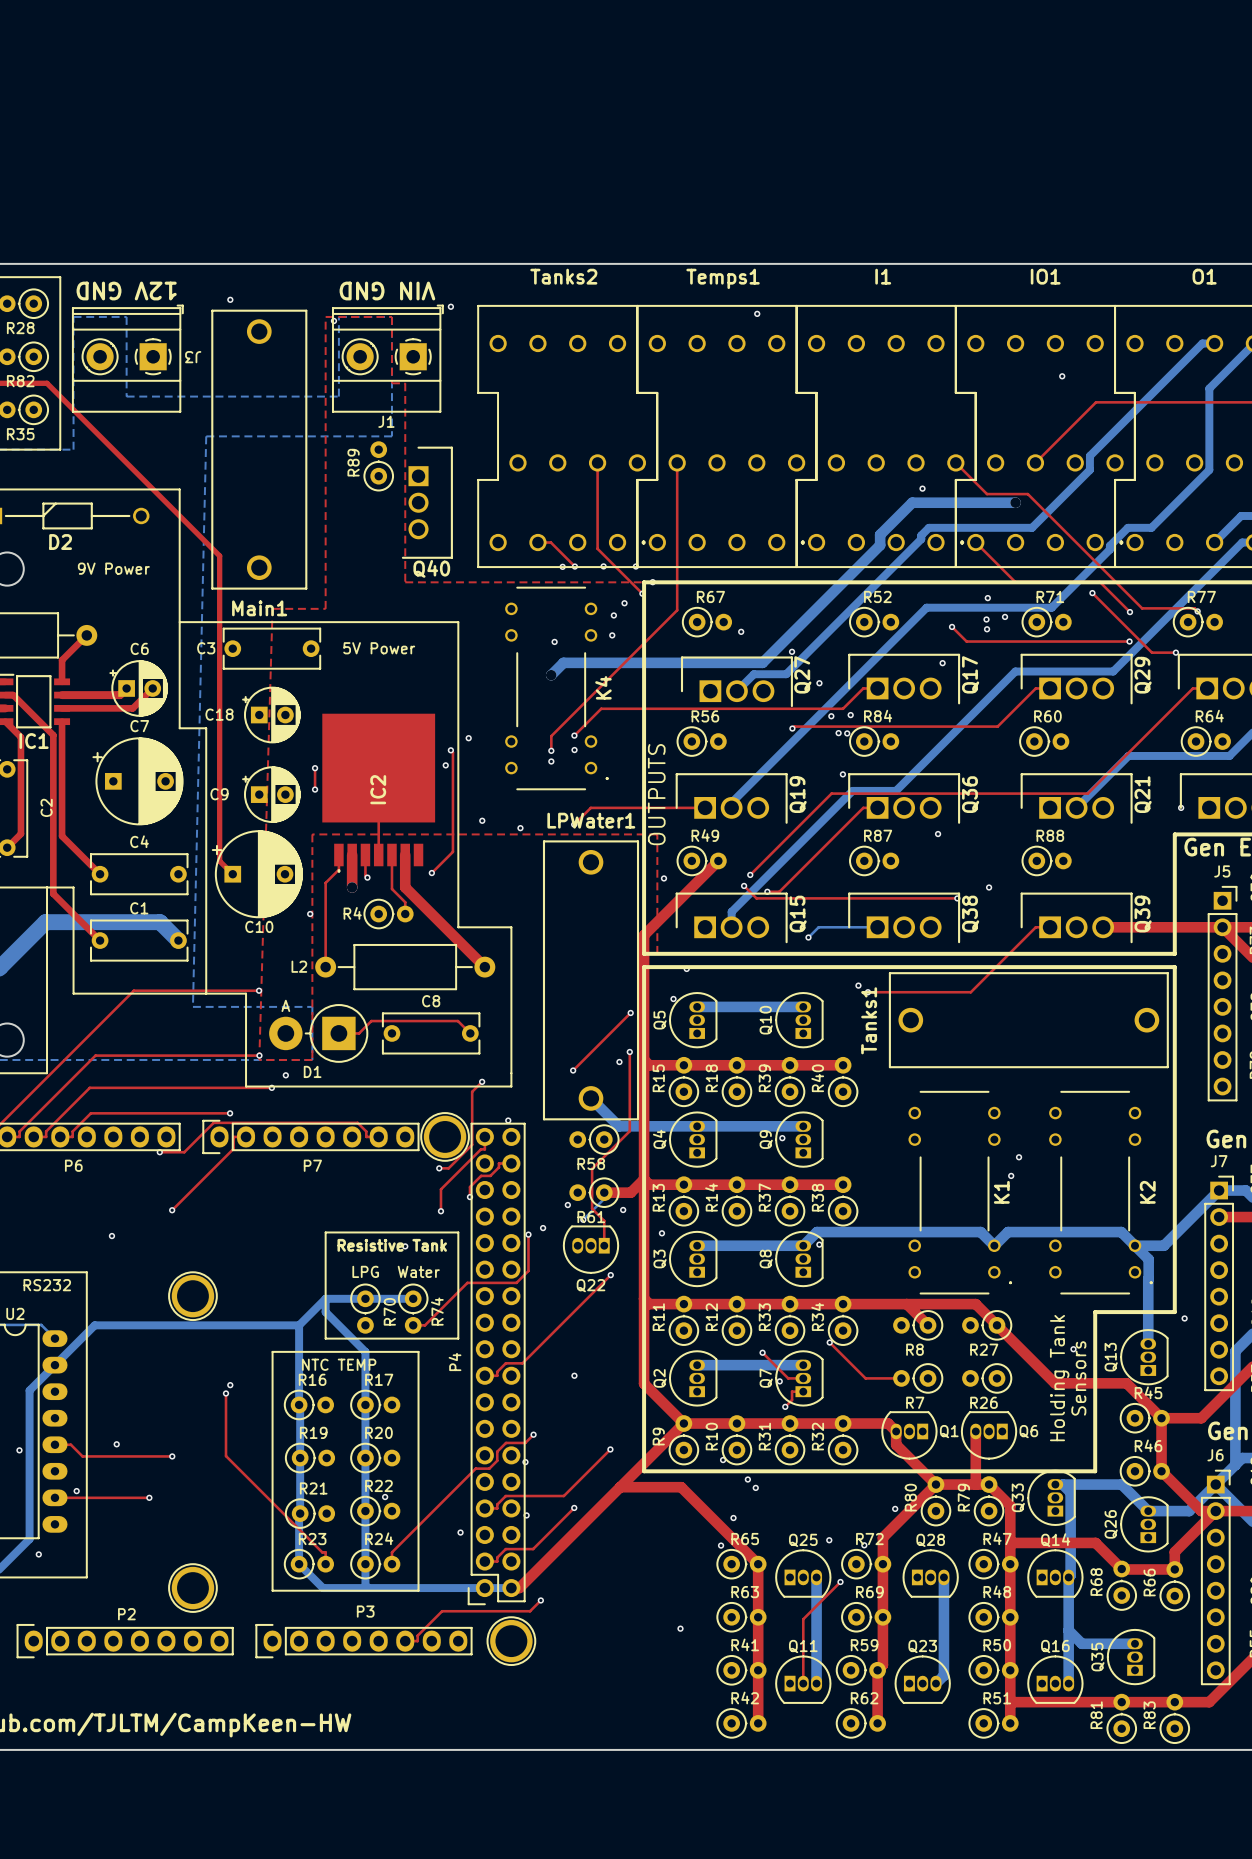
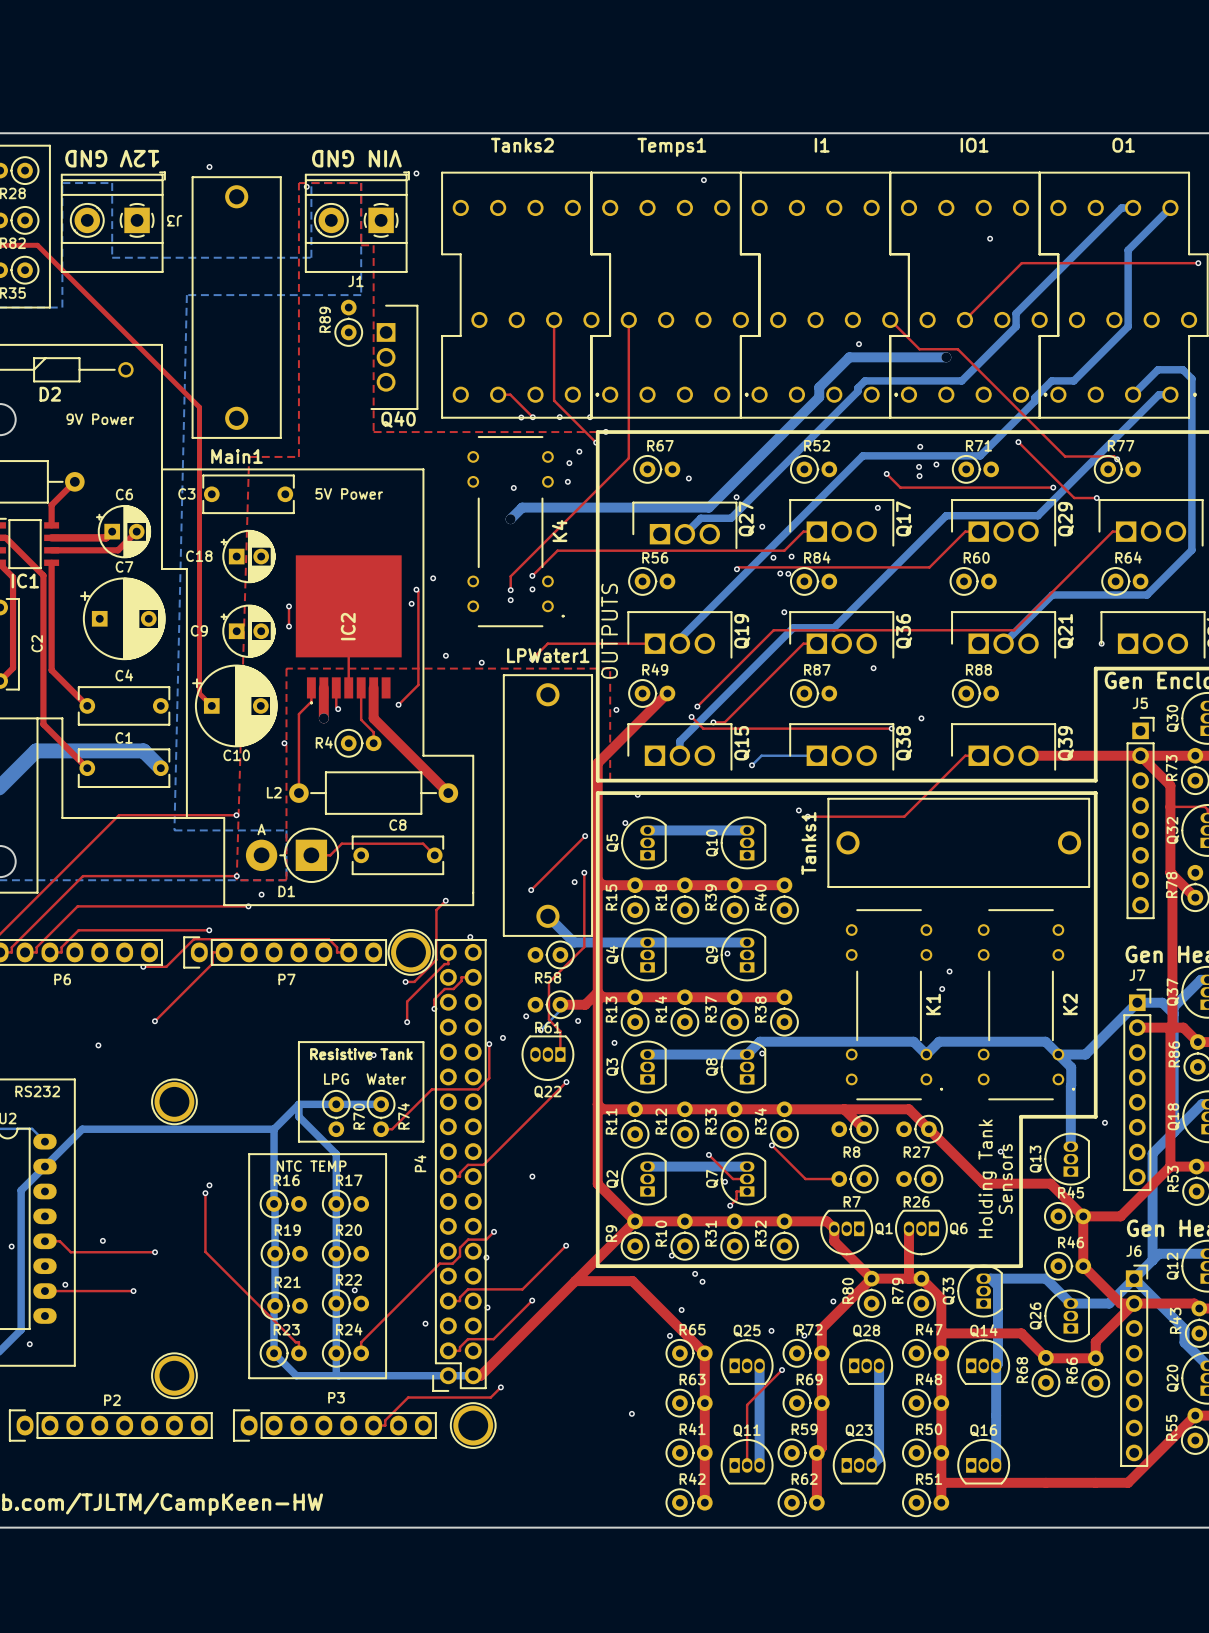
top track: (975, 542) (1015, 581) (1099, 581) (1129, 612) -> none
via: (1129, 612) -> none
bottom track: (1068, 1630) (1081, 1643) (1135, 1643) -> none
Q35: (1131, 1657) -> none
R81: (1121, 1718) -> none
R83: (1174, 1718) -> none

